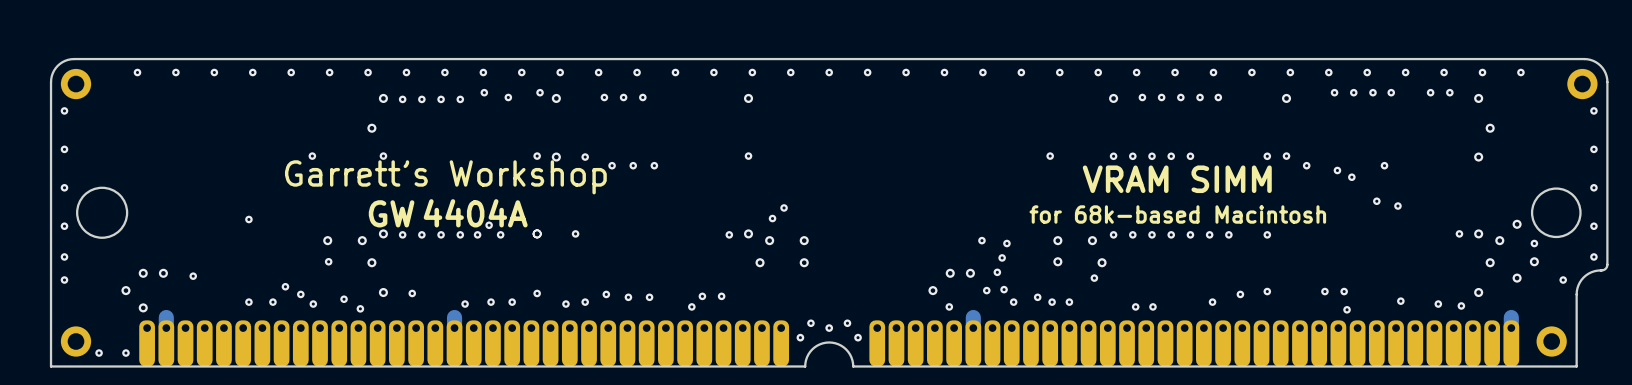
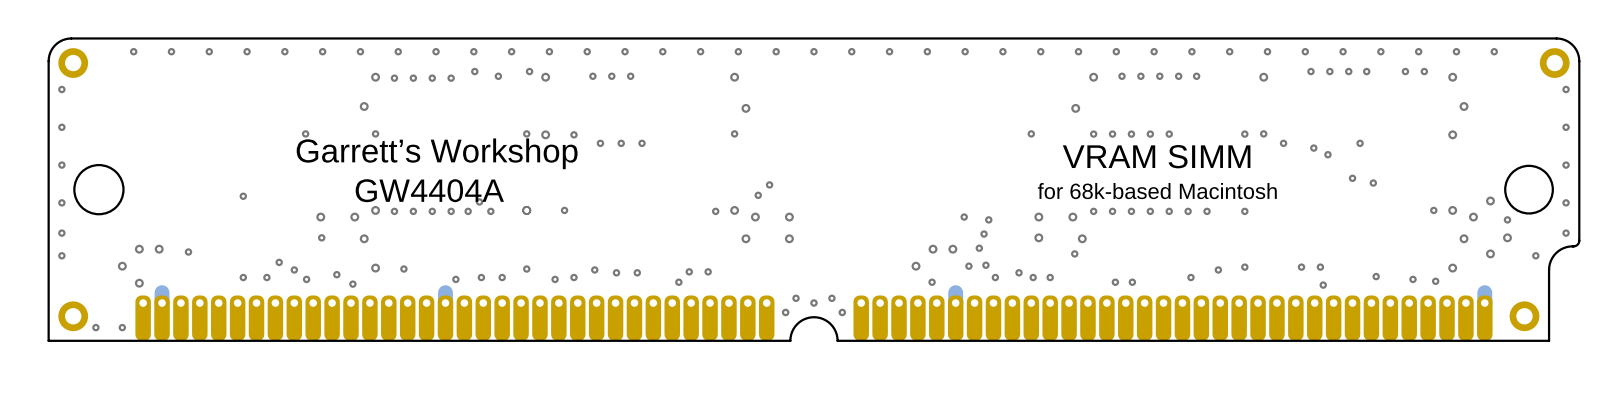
via: none -> (745, 108)
via: none -> (1075, 108)

